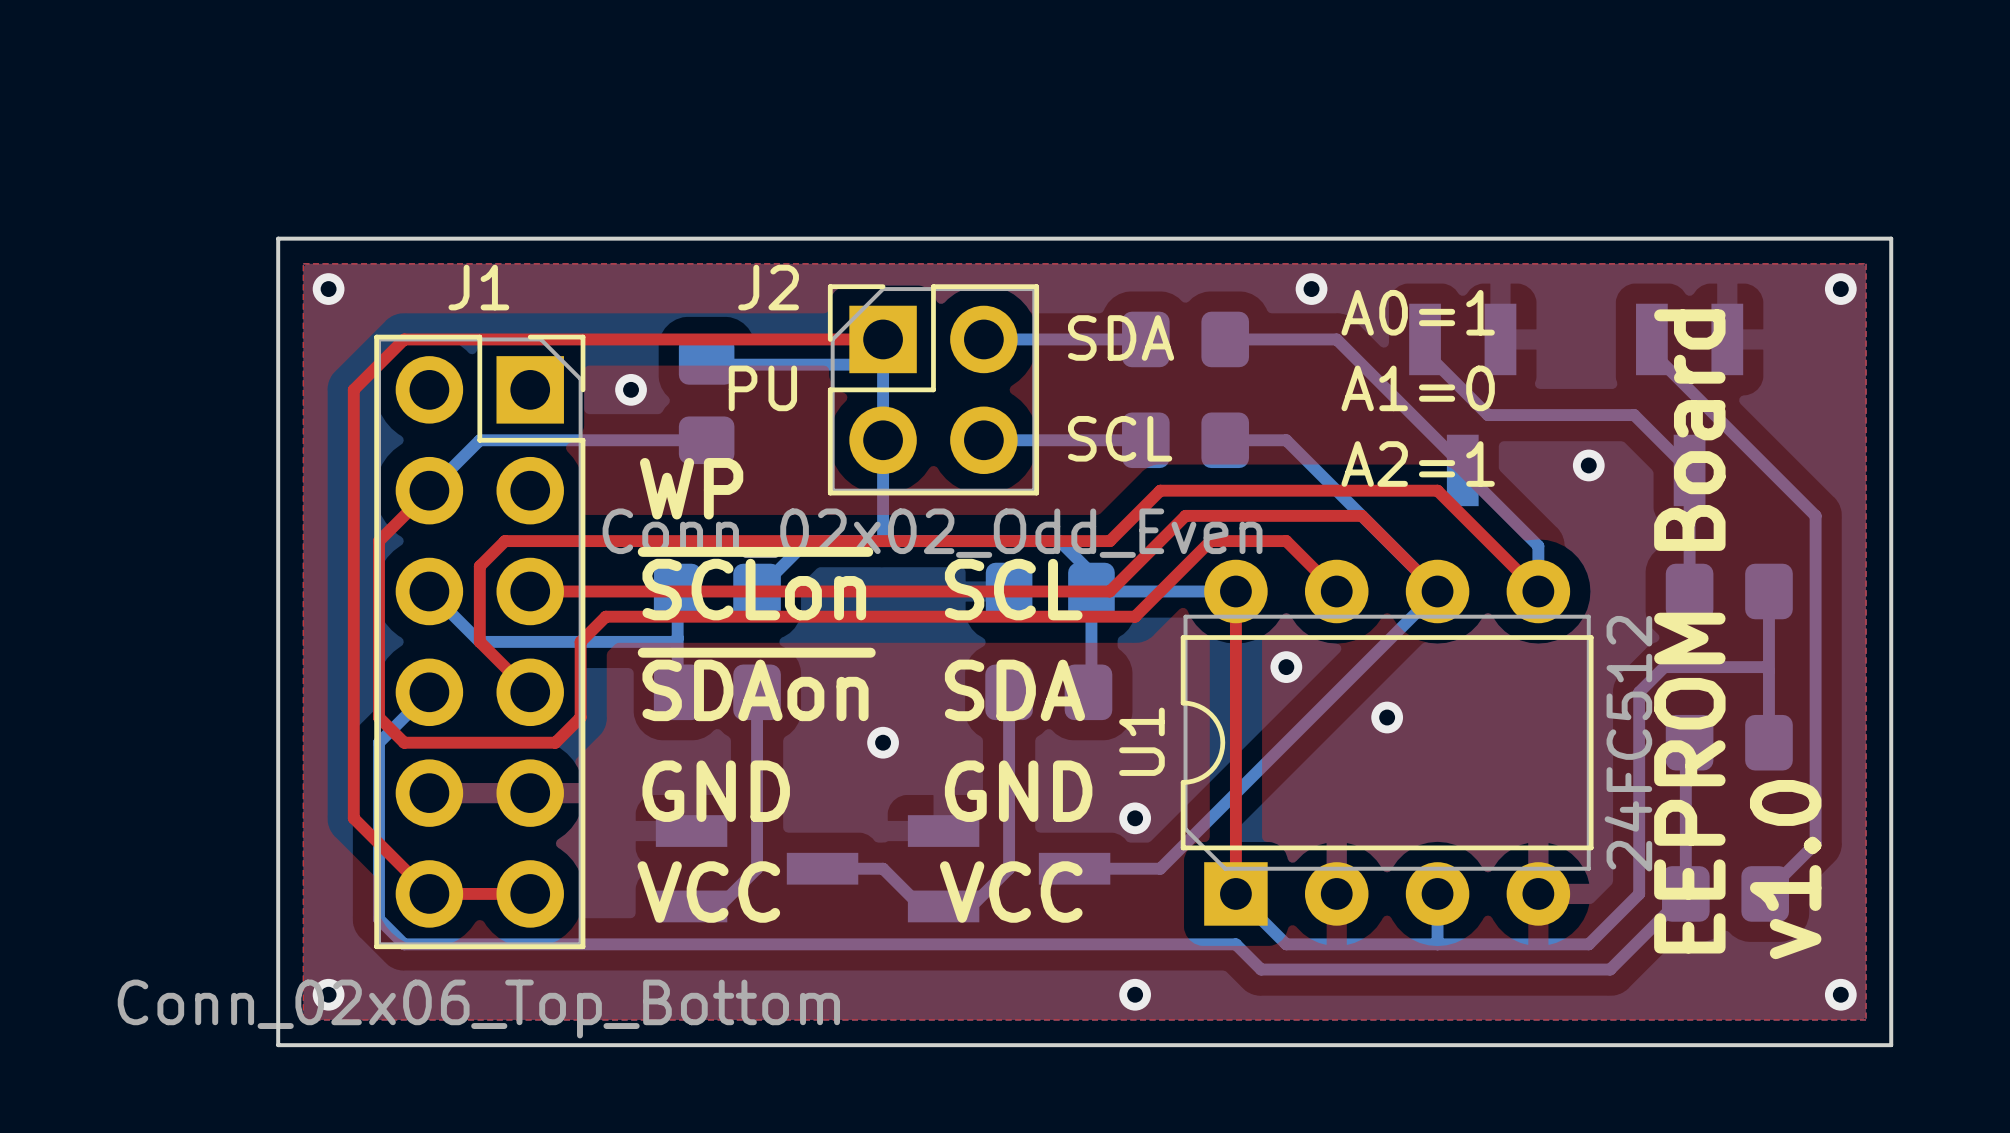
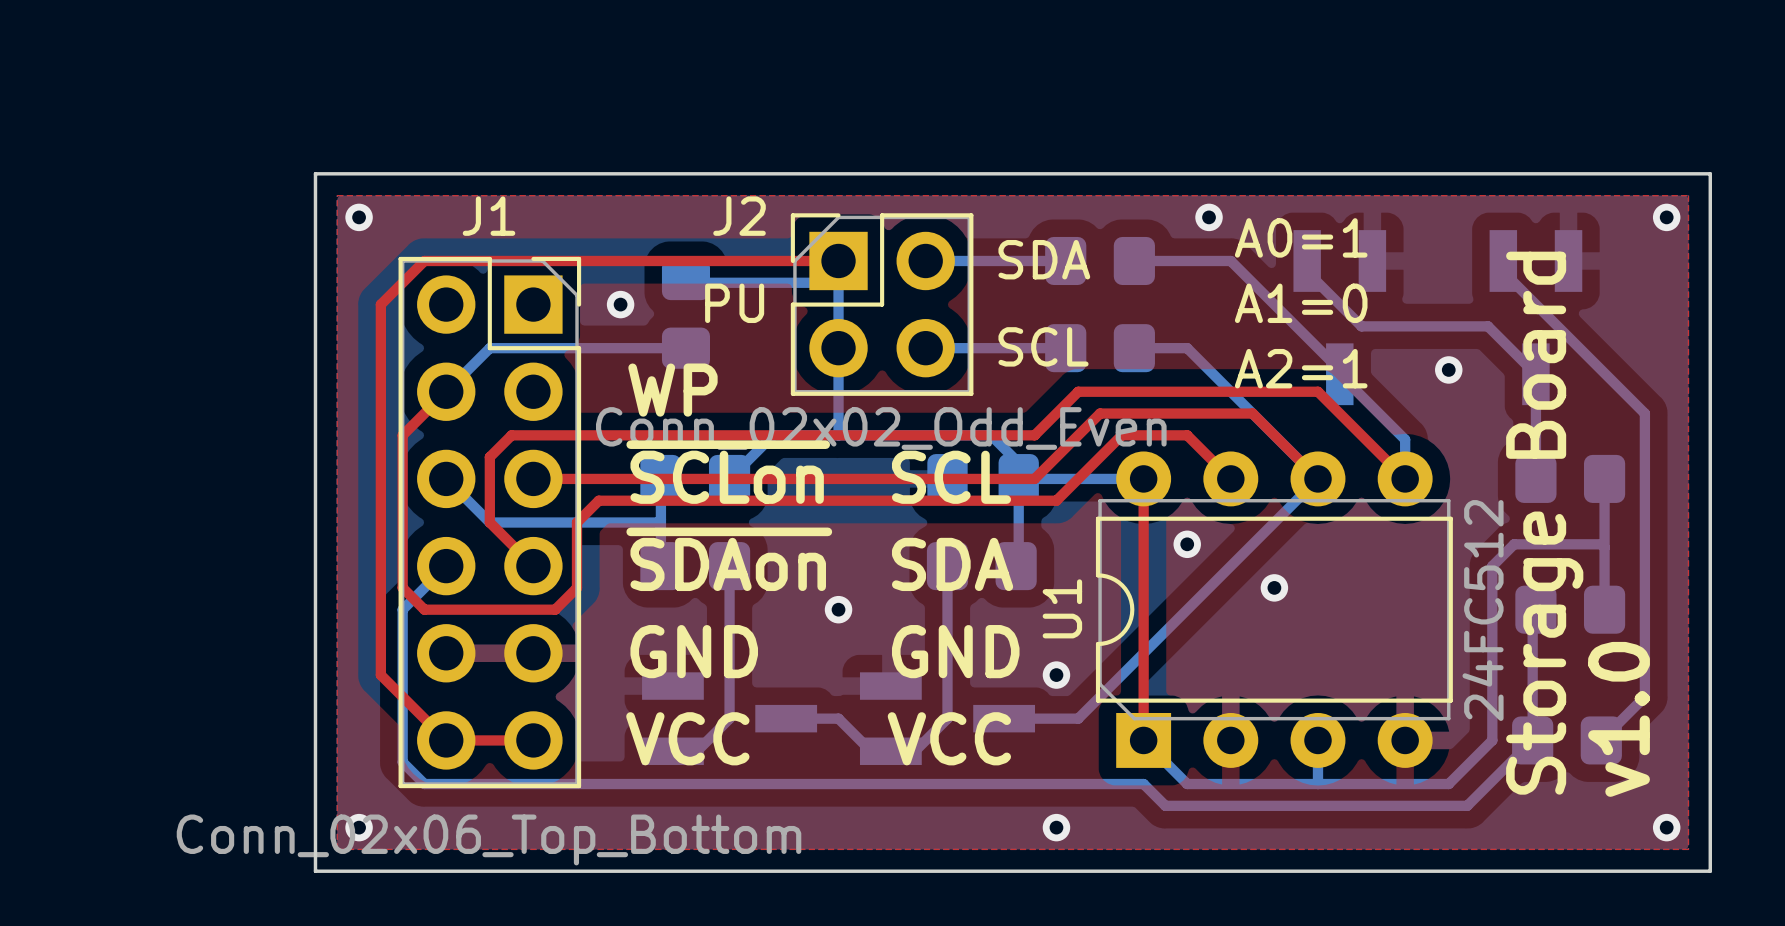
text: EEPROM Board (1689, 631) -> Storage Board (1544, 523)

